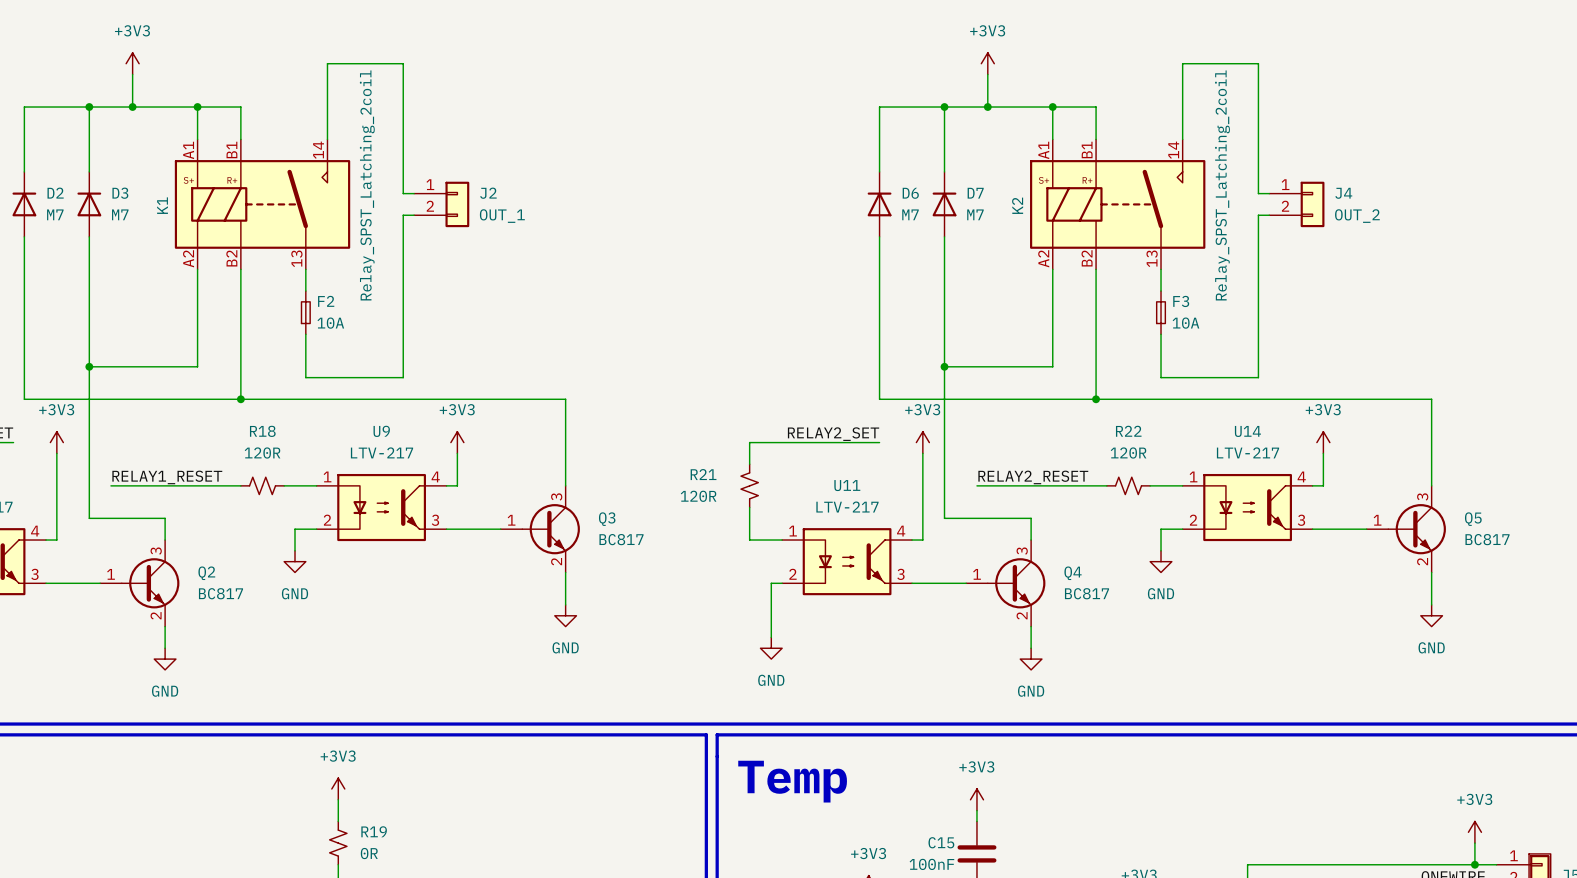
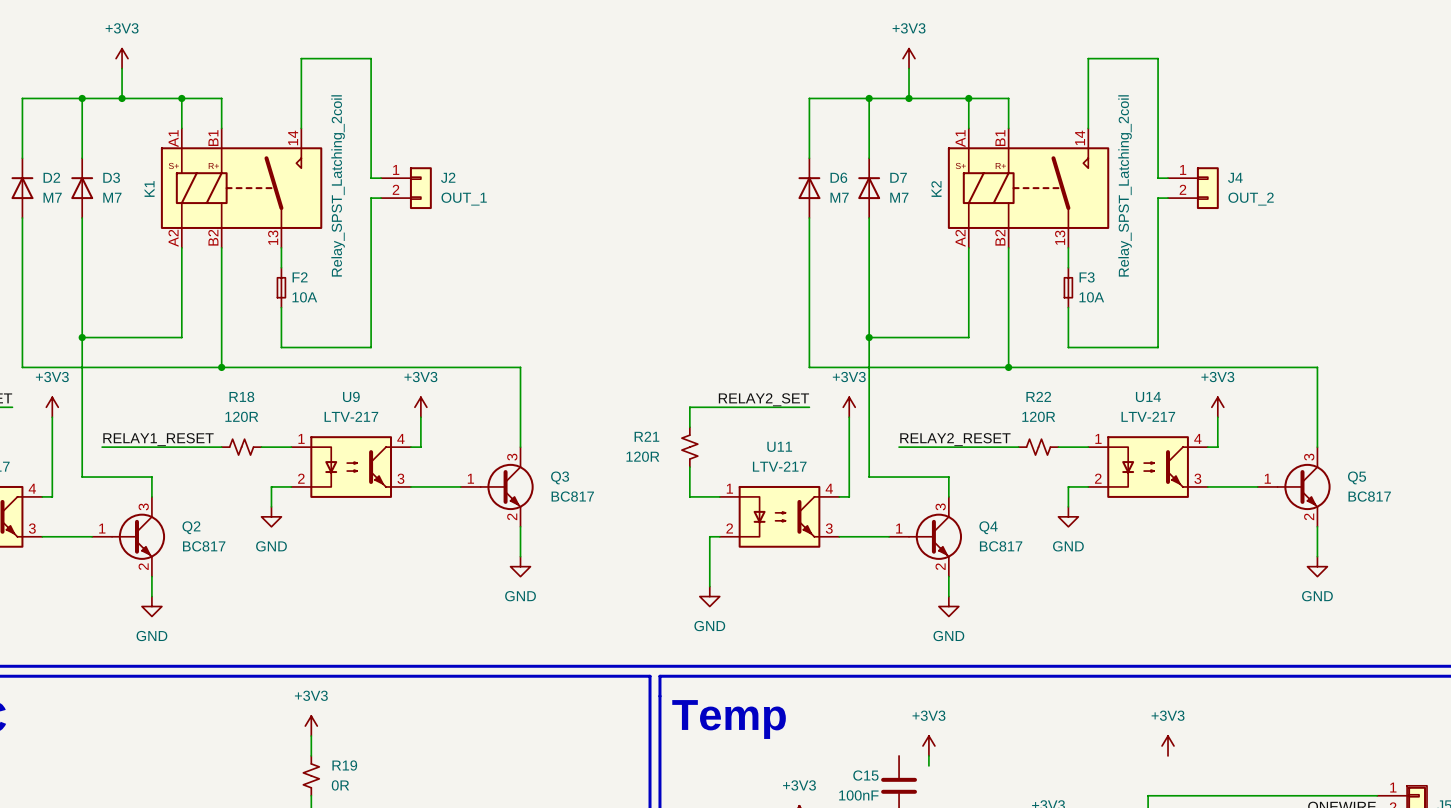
power symbol position: +3V3 (976, 799) -> +3V3 (928, 745)
wire: (976, 810) (976, 821) -> (928, 755) (928, 765)
power symbol: none -> +3V3 (1168, 745)
power symbol: +3V3 (1474, 832) -> none
wire: (1474, 843) (1474, 864) -> none
junction: (1474, 864) -> none

